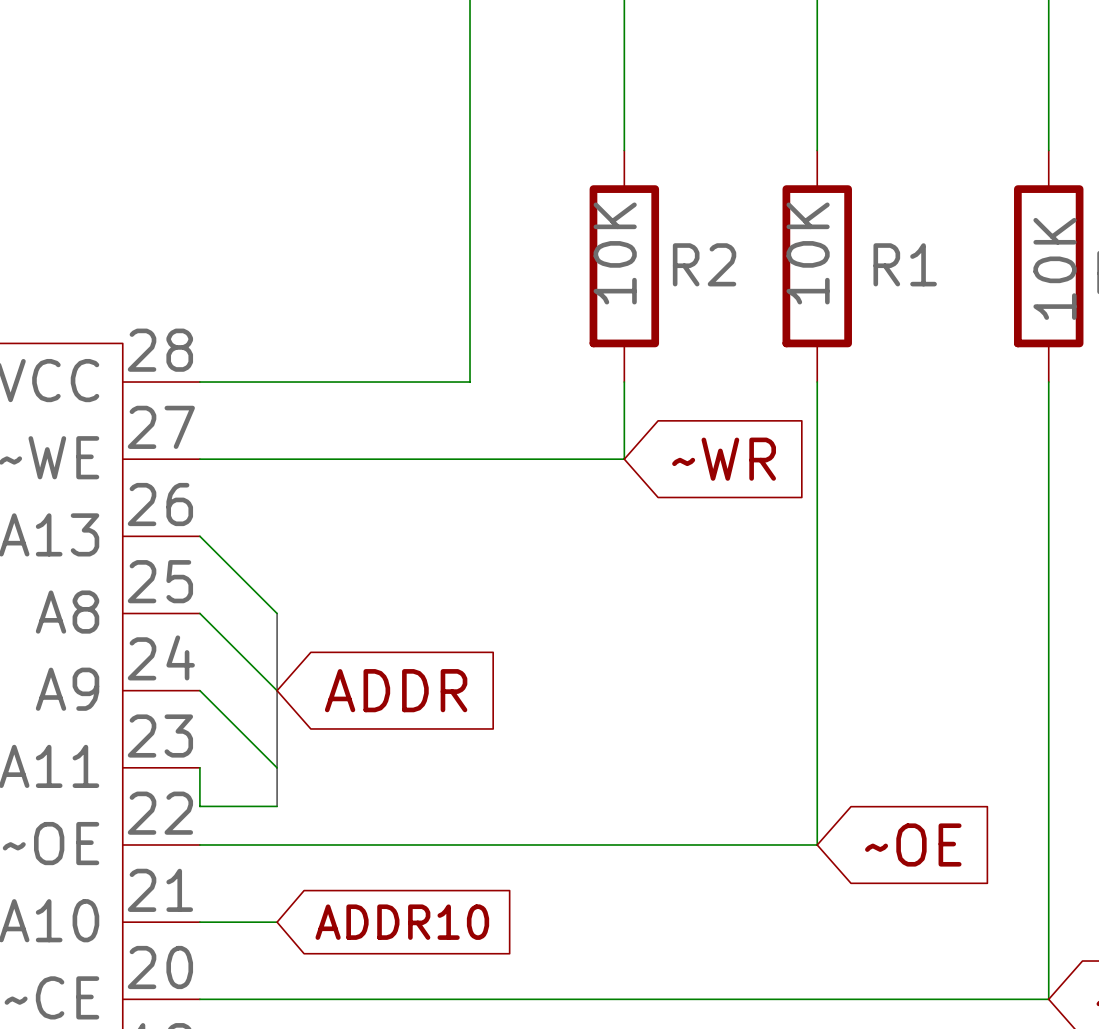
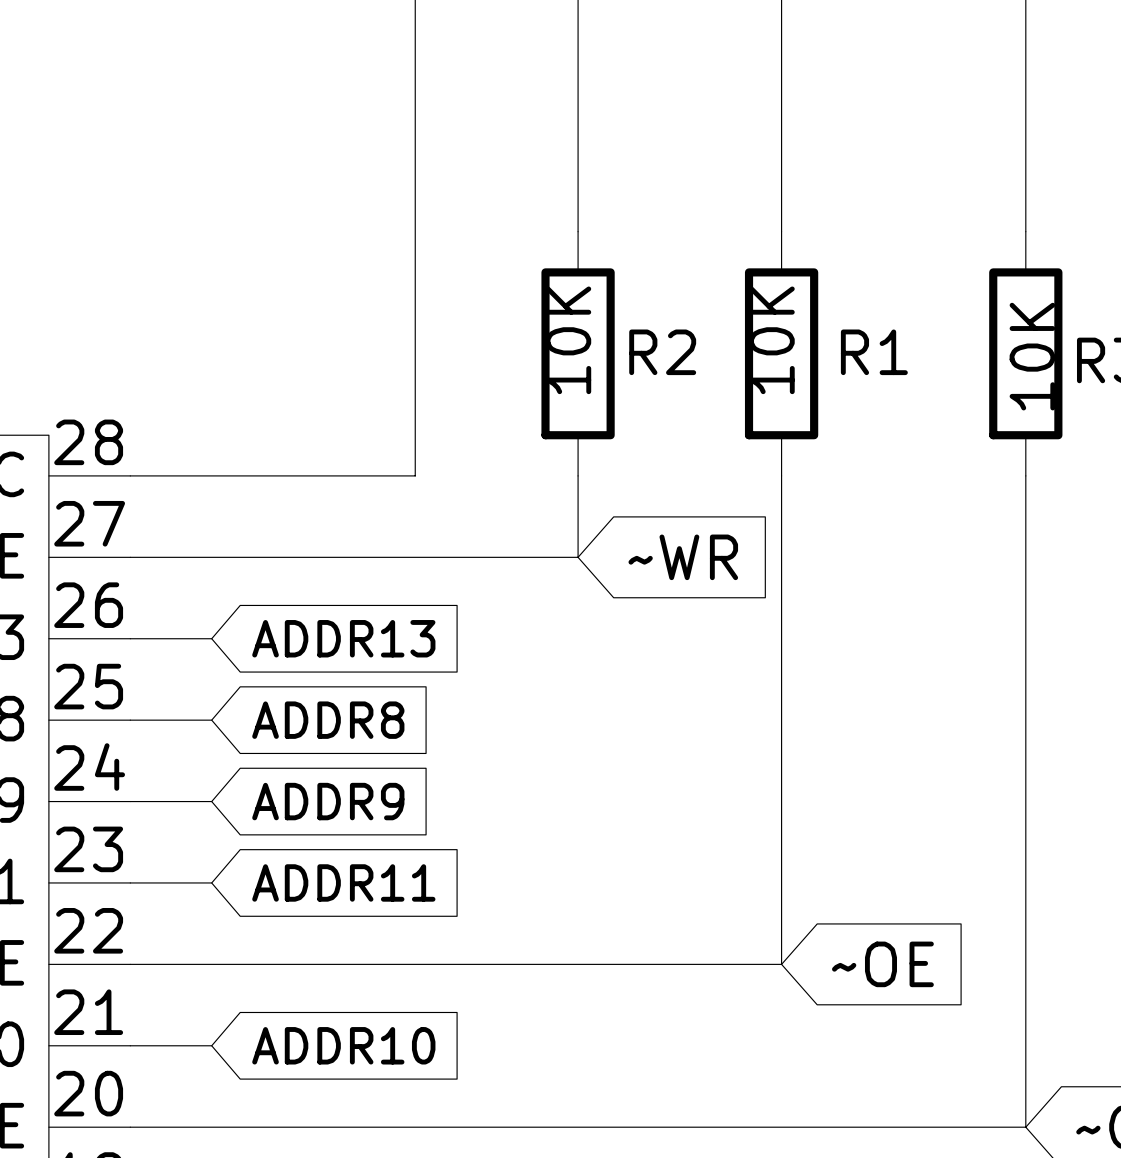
wire: (199, 536) (277, 613) -> (130, 638) (211, 638)
global label: none -> ADDR13 (343, 638)
wire: (199, 613) (277, 690) -> (130, 720) (211, 720)
bus: (277, 613) (277, 806) -> none
global label: none -> ADDR8 (328, 720)
wire: (199, 690) (277, 767) -> (130, 801) (211, 801)
global label: ADDR (396, 690) -> ADDR9 (328, 801)
wire: (199, 767) (199, 806) (277, 806) -> (130, 882) (211, 882)
global label: none -> ADDR11 (343, 882)

